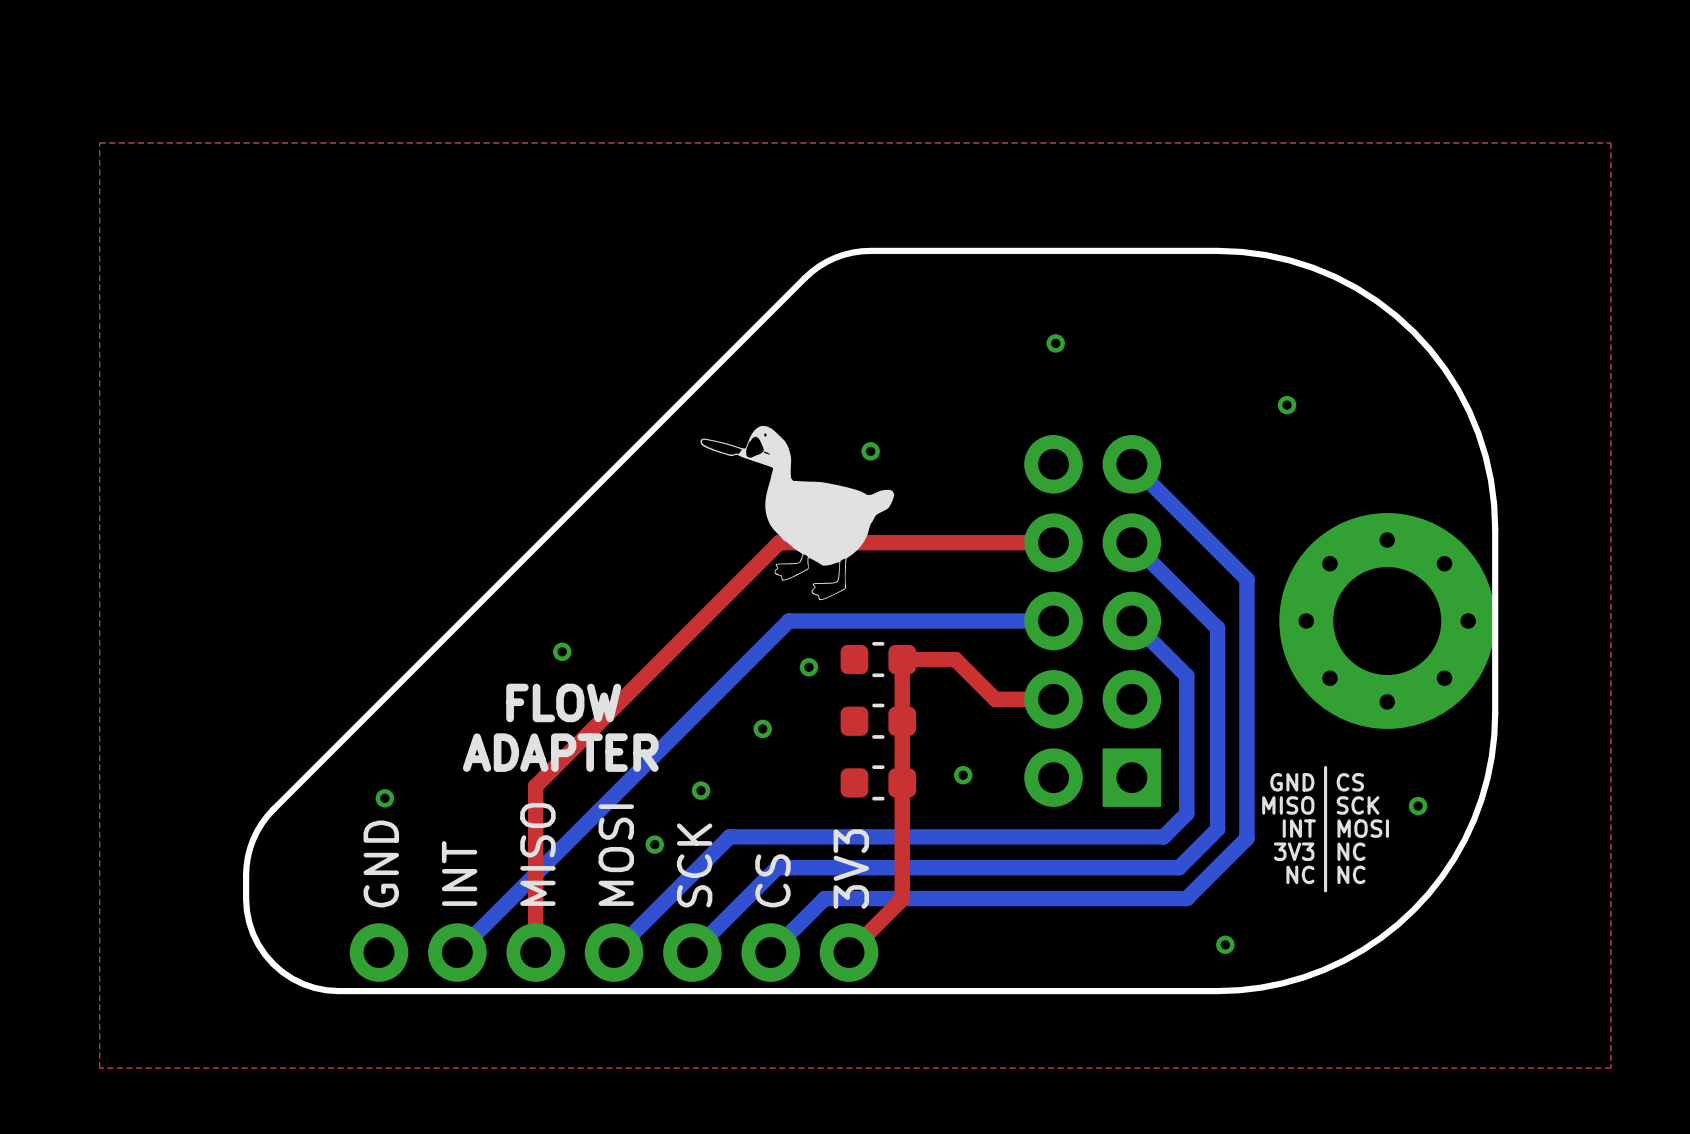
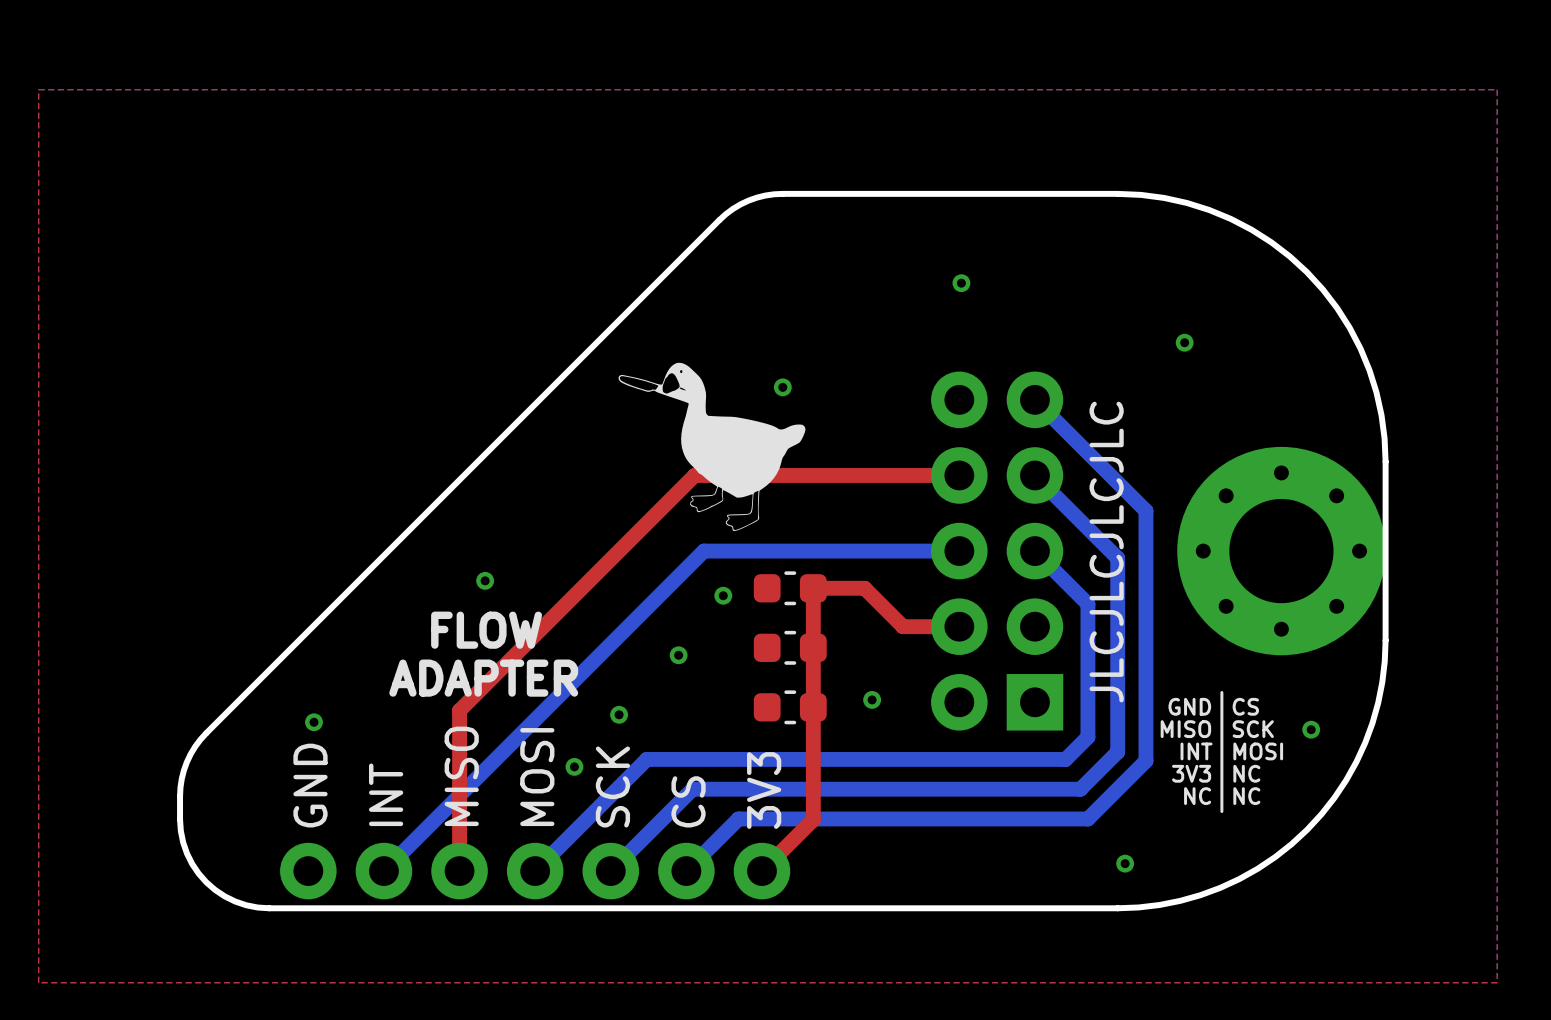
text: none -> JLCJLCJLCJLC (1106, 552)

